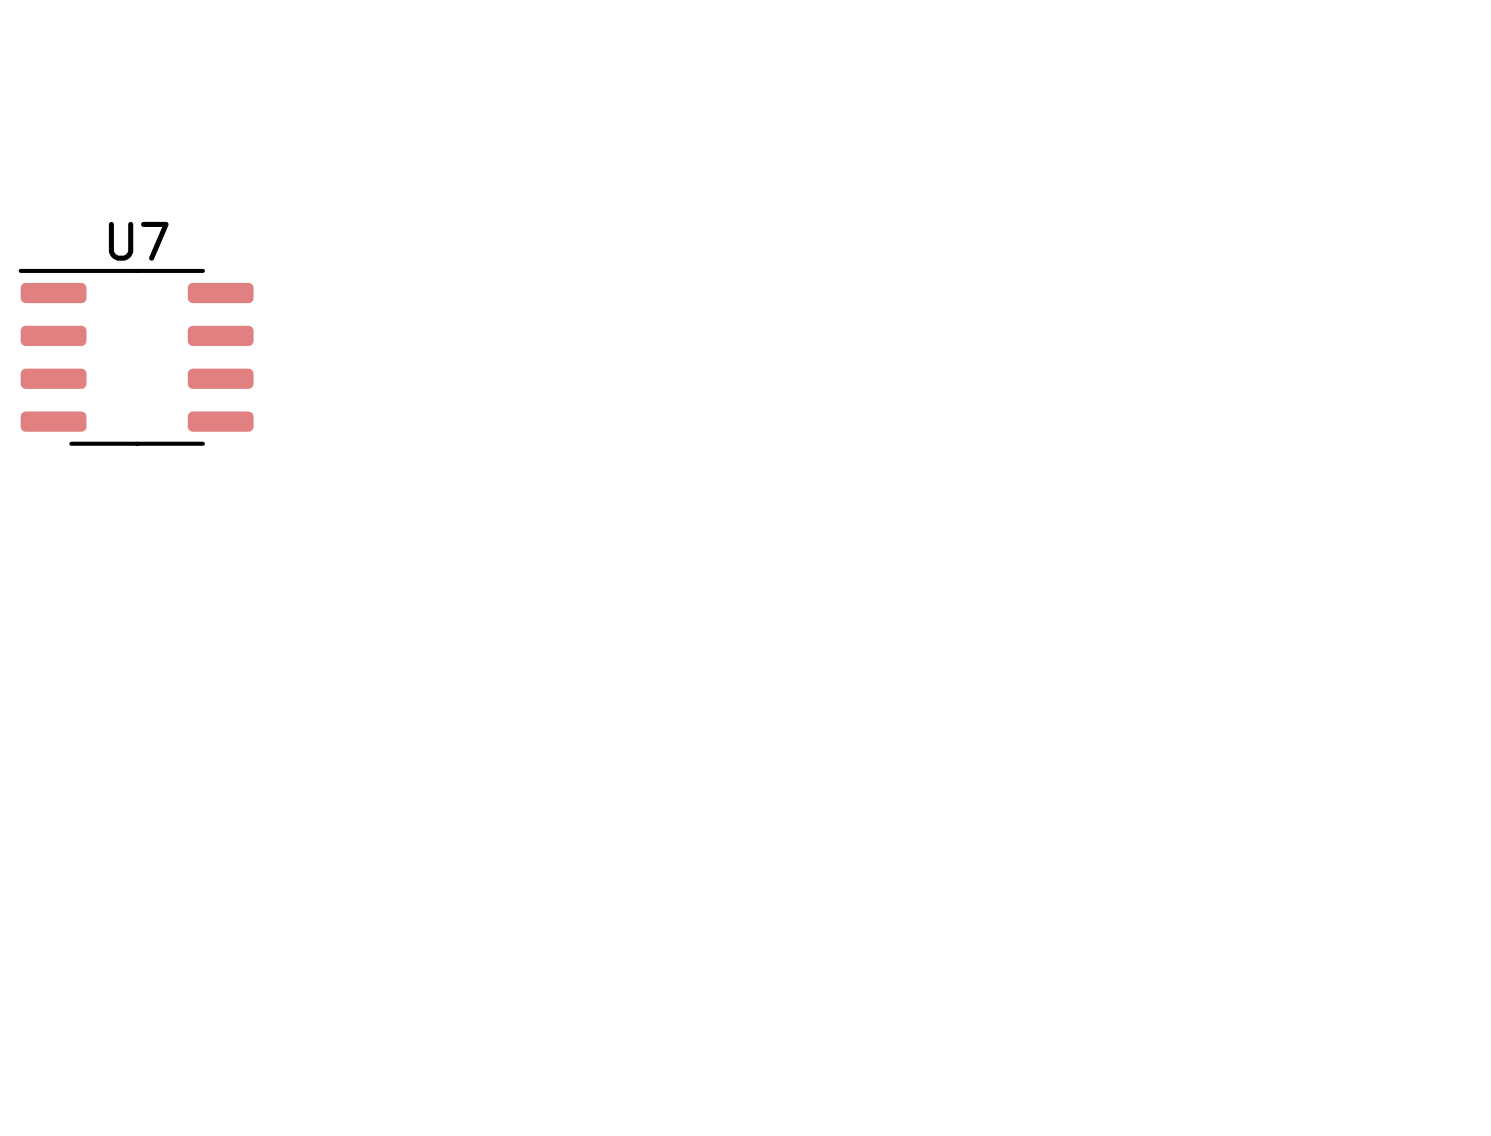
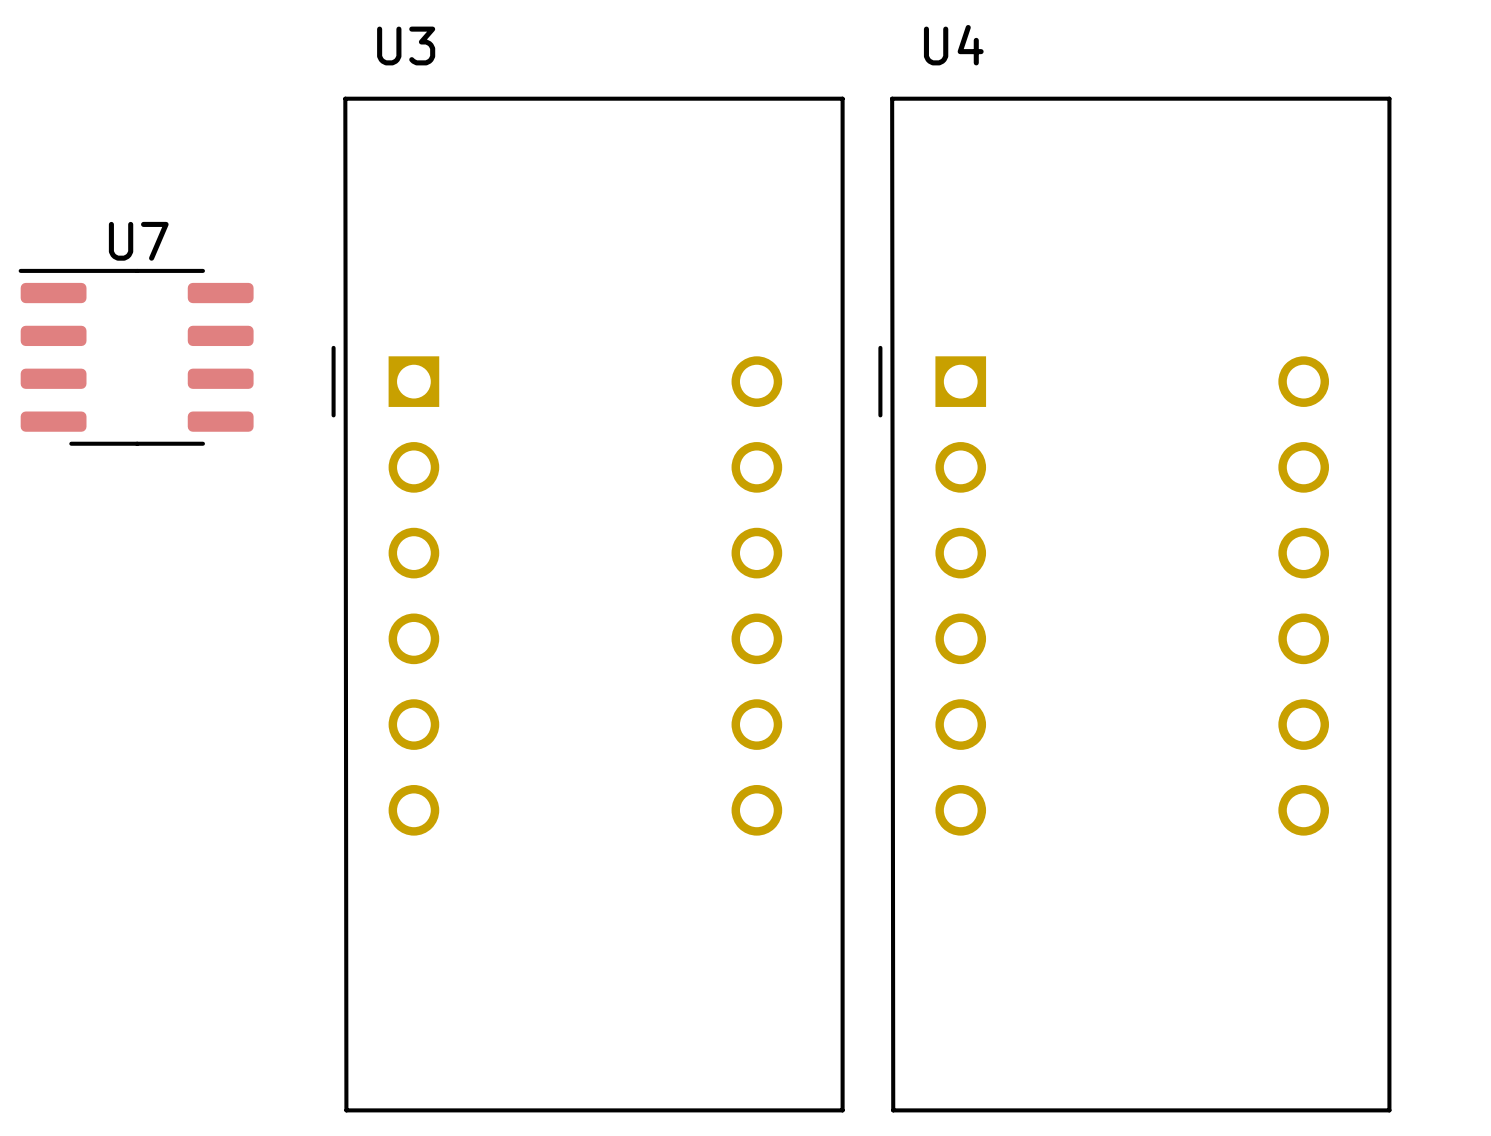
U3: none -> (588, 604)
U4: none -> (1134, 604)

